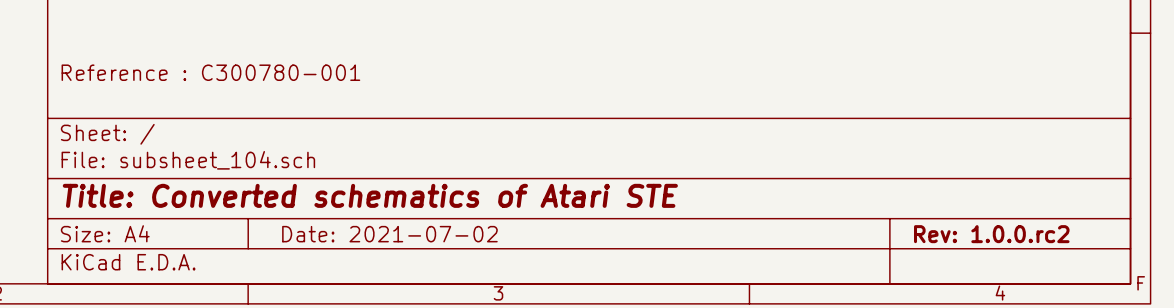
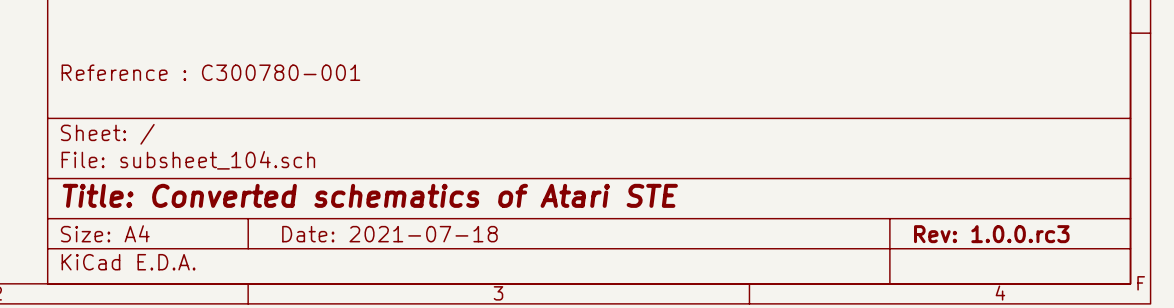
title block: Date: 2021-07-02 (389, 234) -> Date: 2021-07-18 (389, 234)
title block: Rev: 1.0.0.rc2 (991, 234) -> Rev: 1.0.0.rc3 (991, 234)

